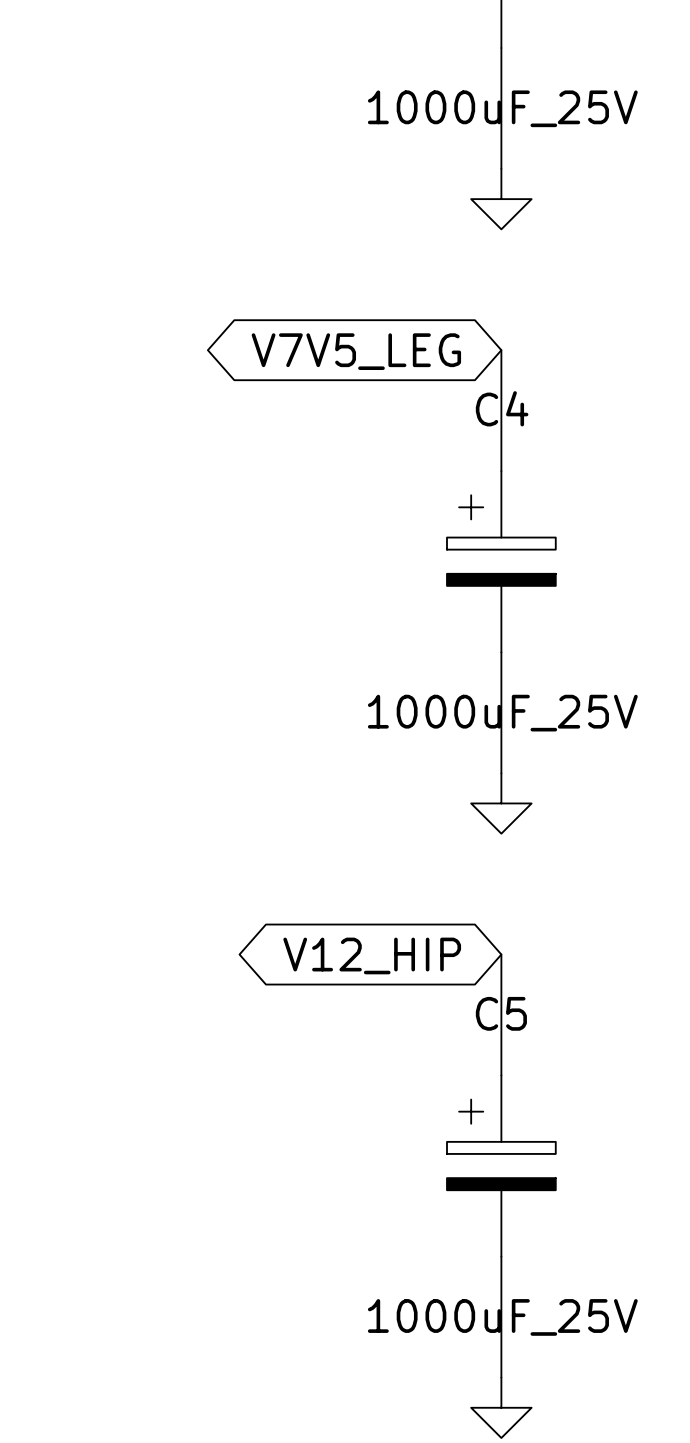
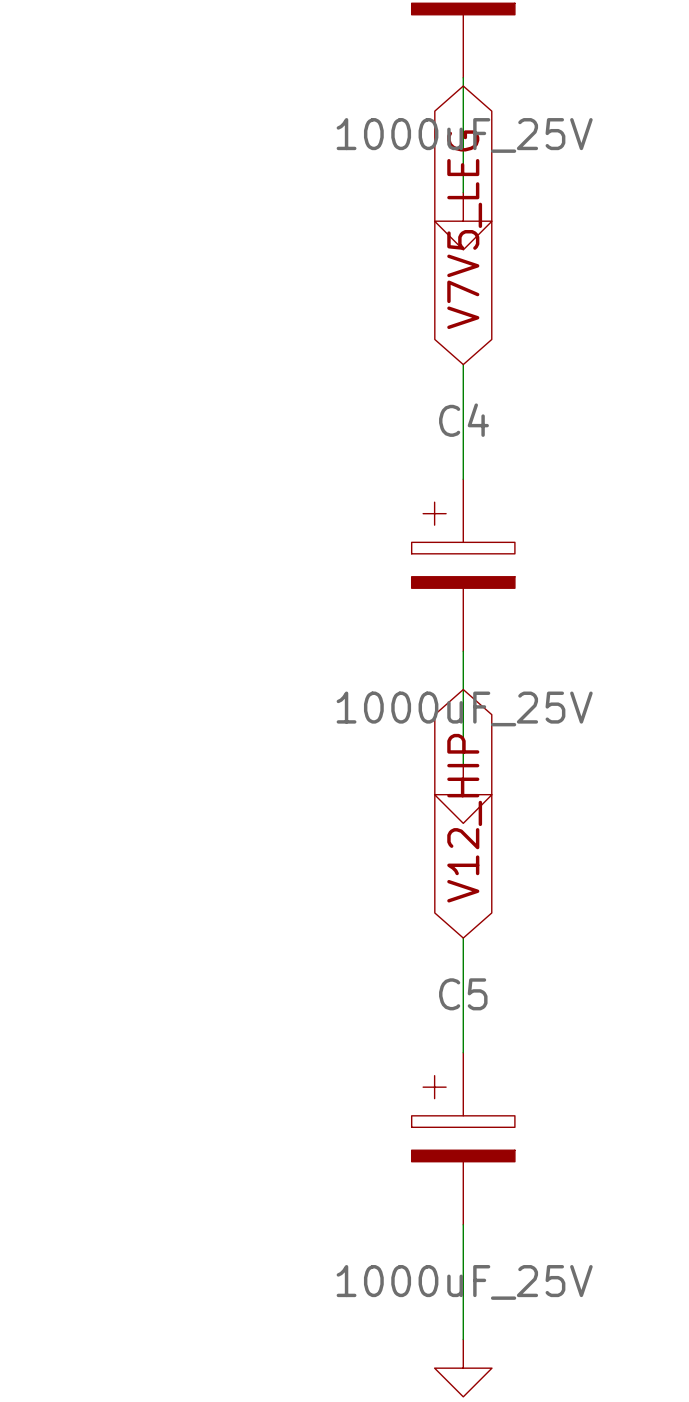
global label rotation: 0° (356, 351) -> 90° clockwise (464, 229)
global label rotation: 0° (372, 955) -> 90° clockwise (464, 818)

